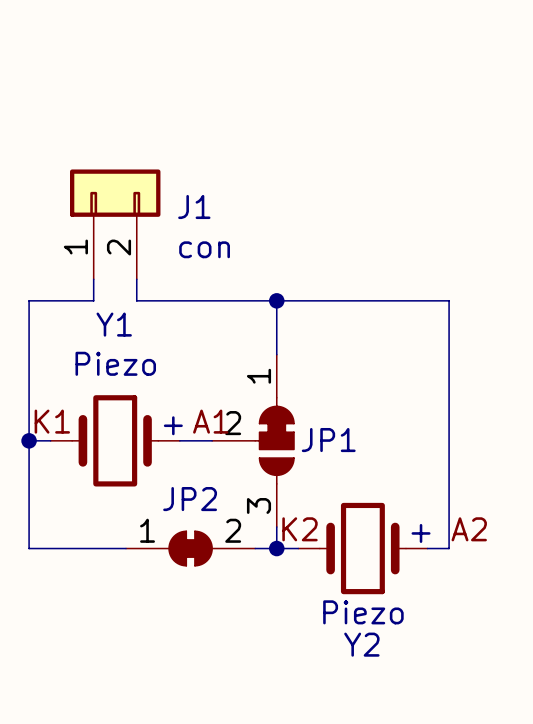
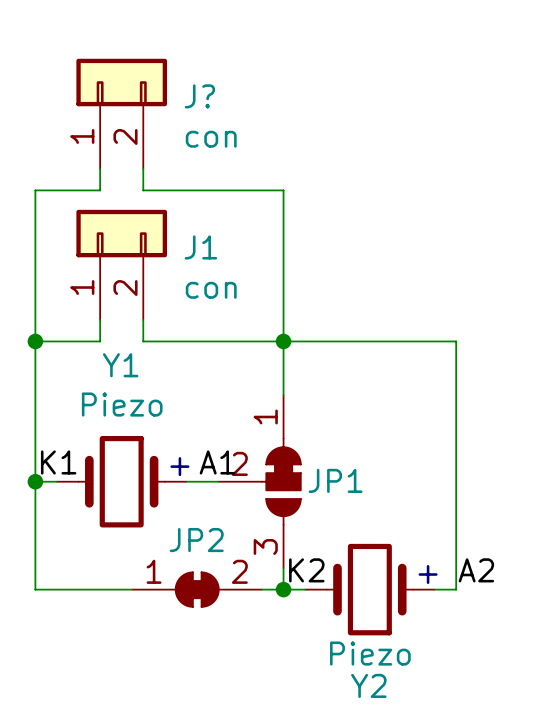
J?: none -> con (121, 113)
wire: none -> (100, 168) (100, 190) (35, 190) (35, 341)
wire: none -> (143, 168) (143, 190) (283, 190) (283, 341)
junction: none -> (35, 341)

